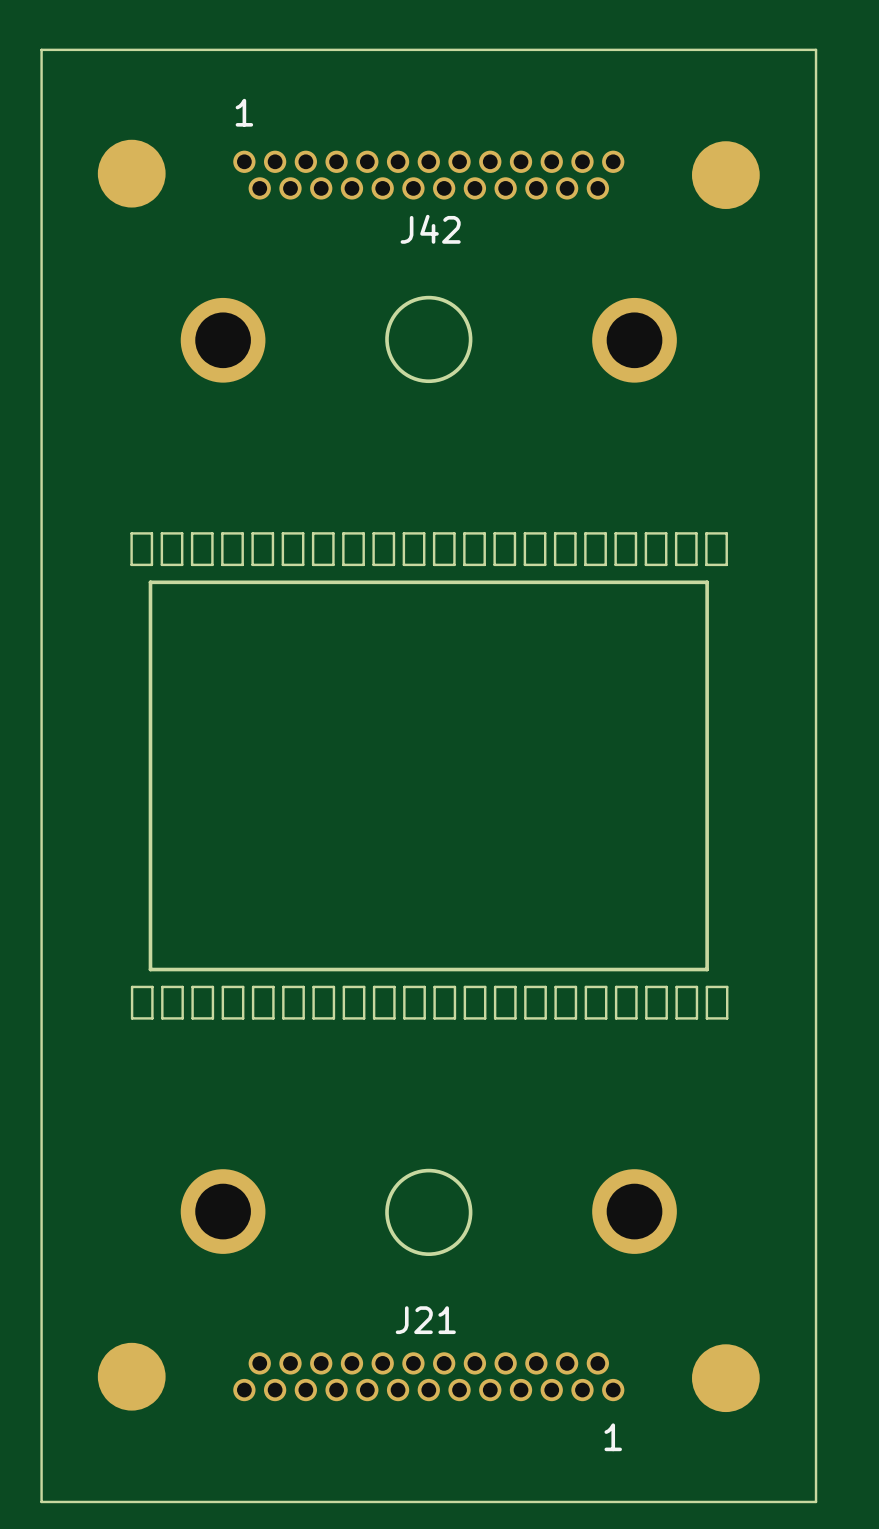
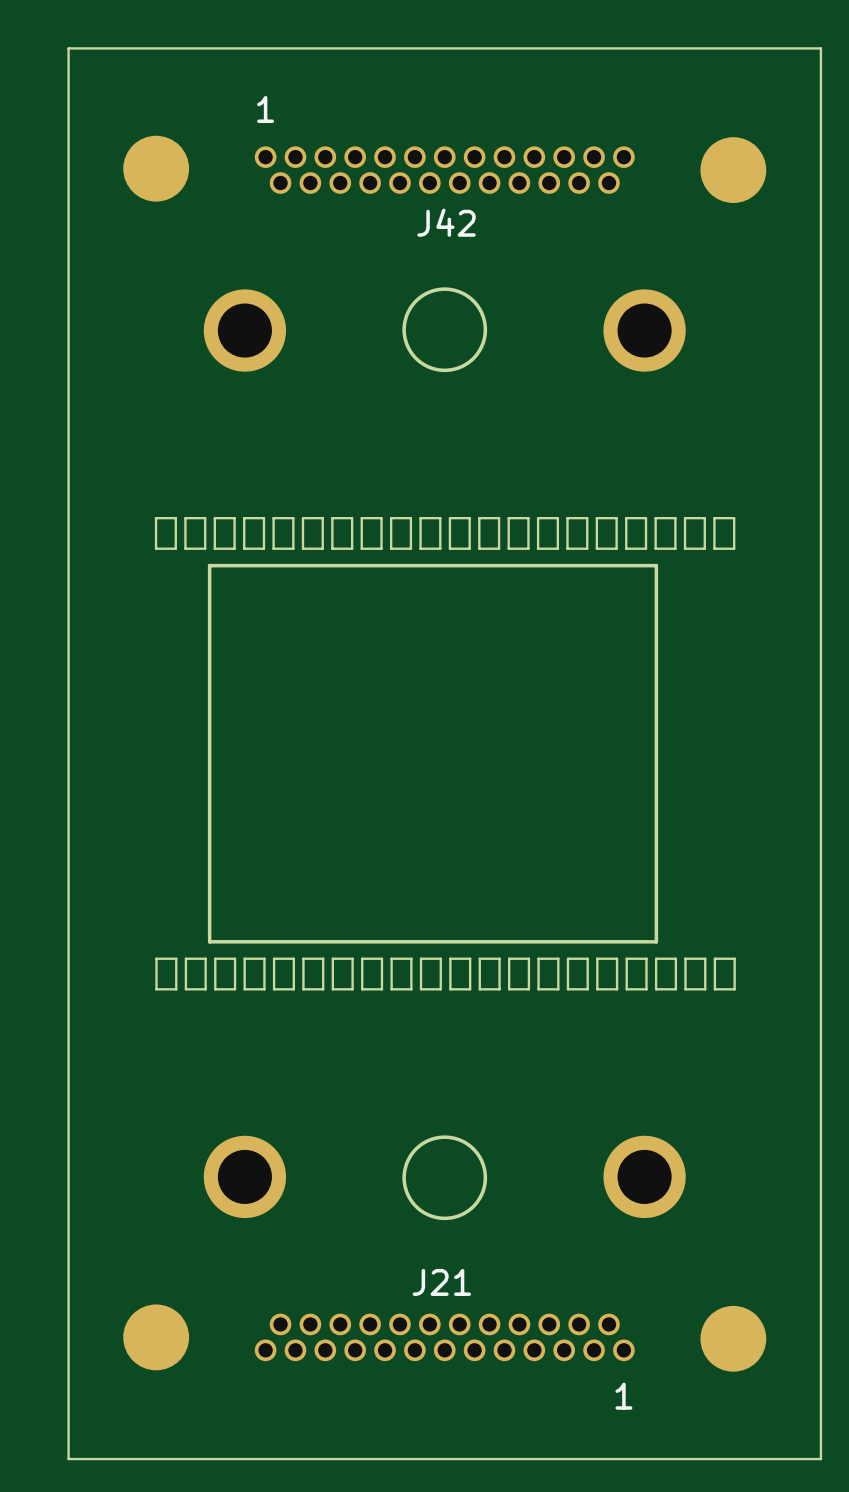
board edge: (186, 582) (150, 582) (150, 969) (186, 969) -> (209, 565) (209, 941)
board edge: (646, 582) (707, 582) (707, 969) (646, 969) -> (656, 565) (656, 941)

